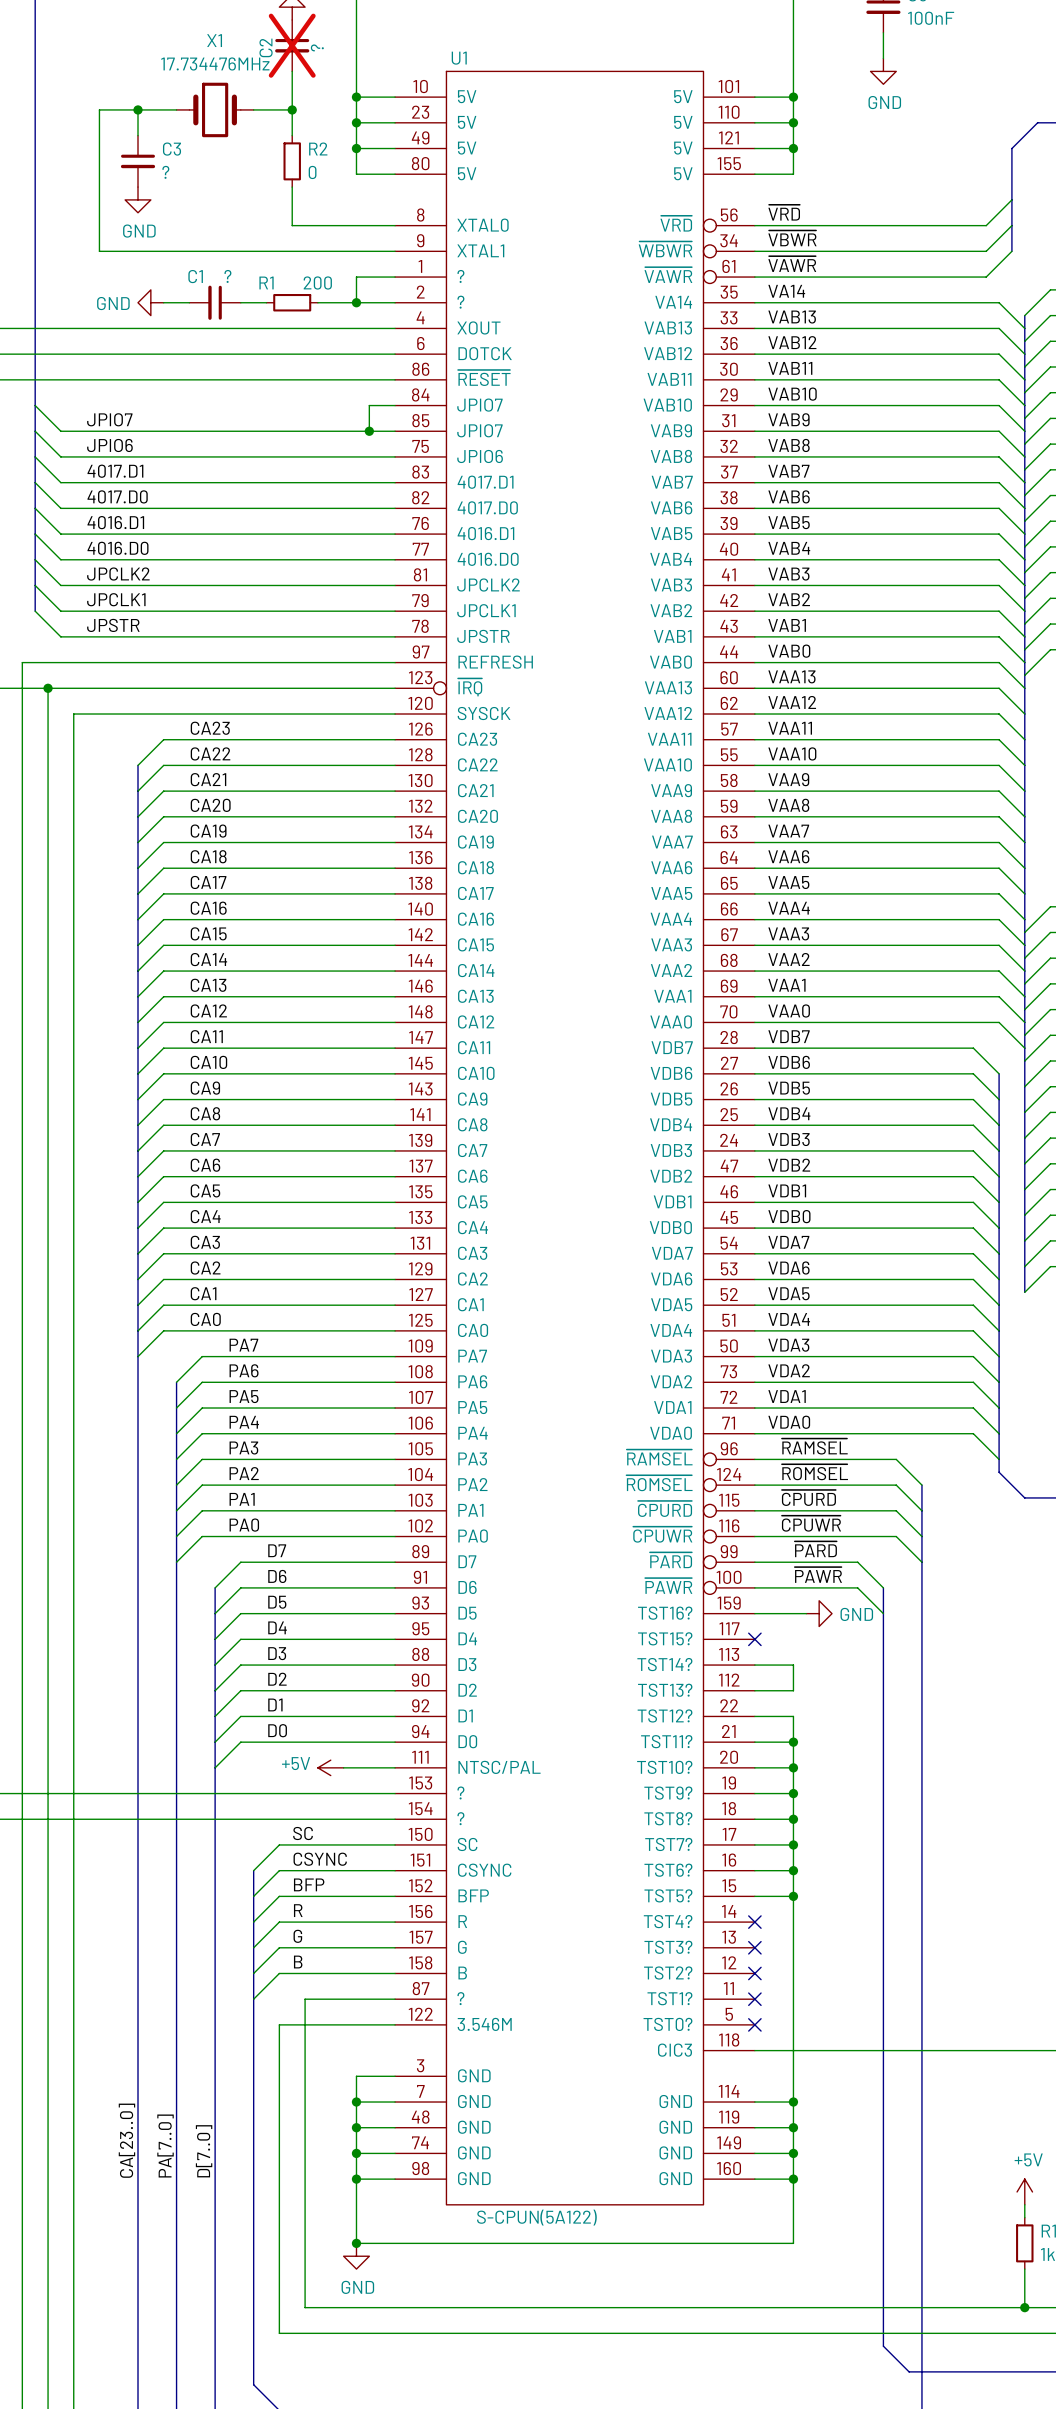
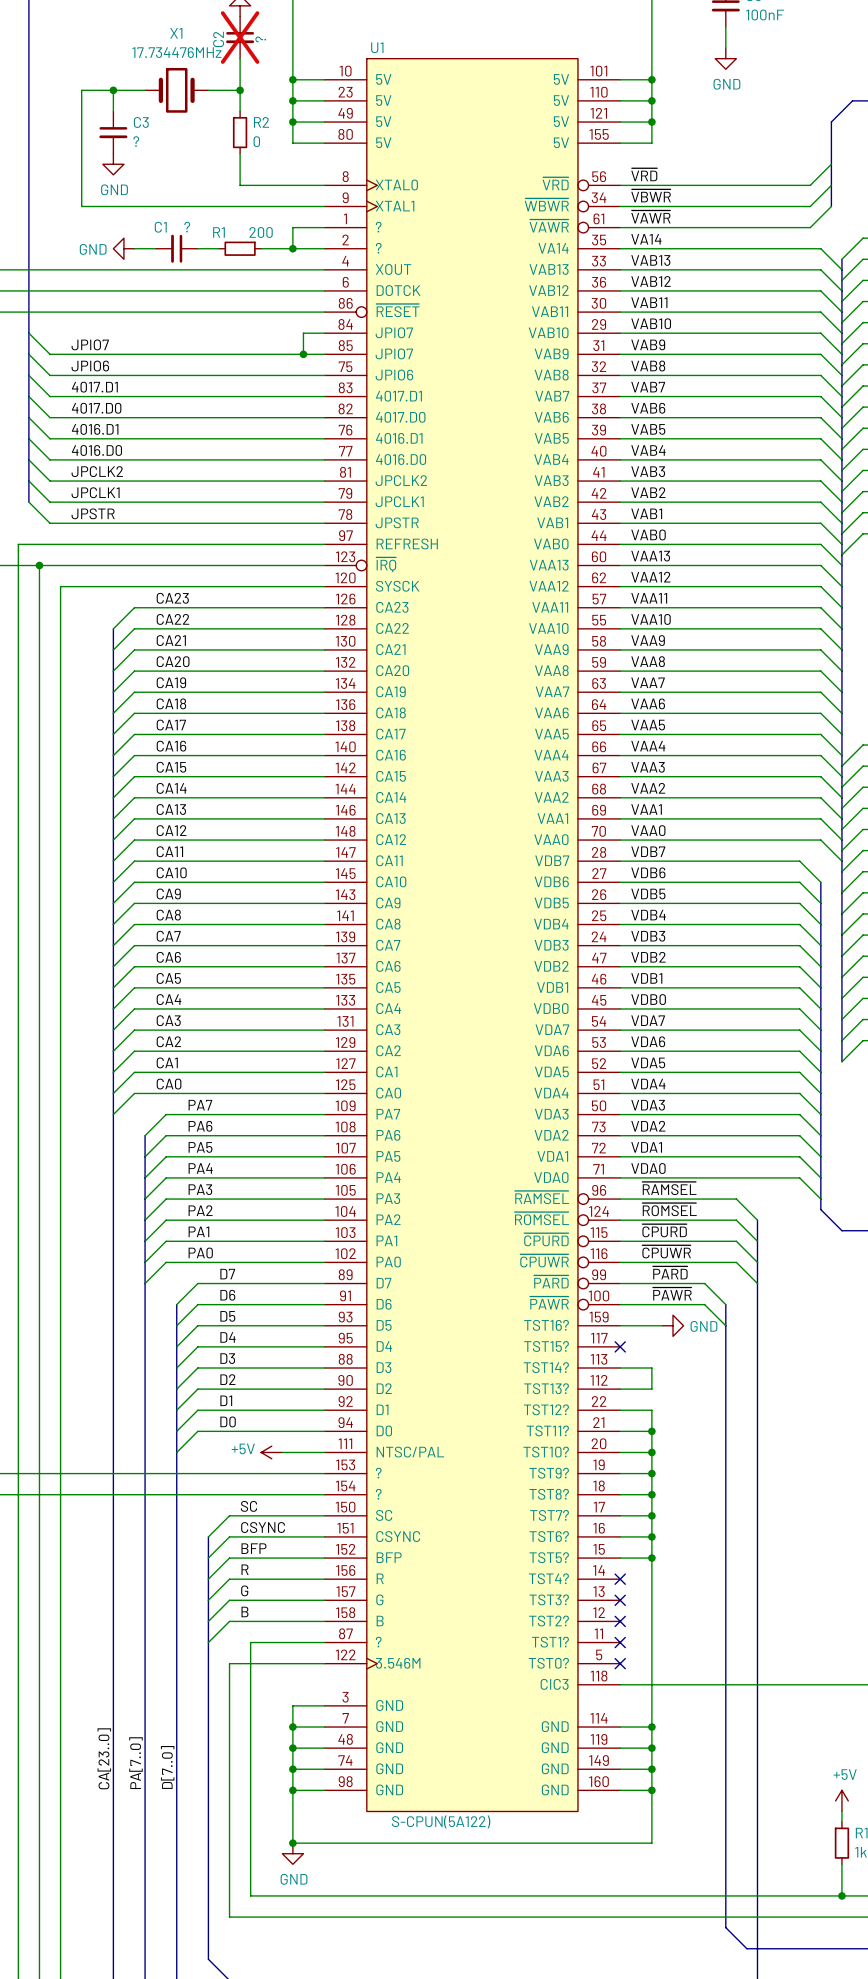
U1 symbol: [395, 71, 755, 2205] -> [324, 58, 621, 1812]

